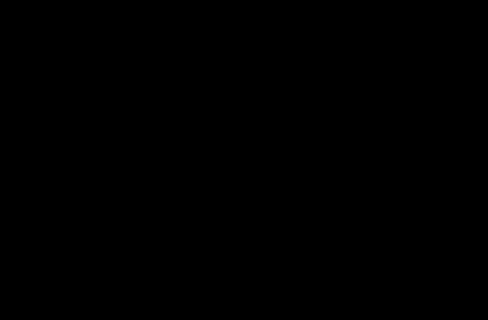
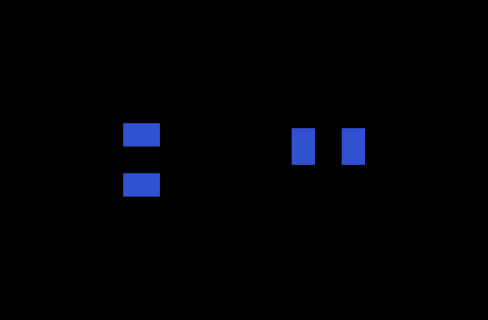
part: none -> (328, 146)
part: none -> (141, 159)

